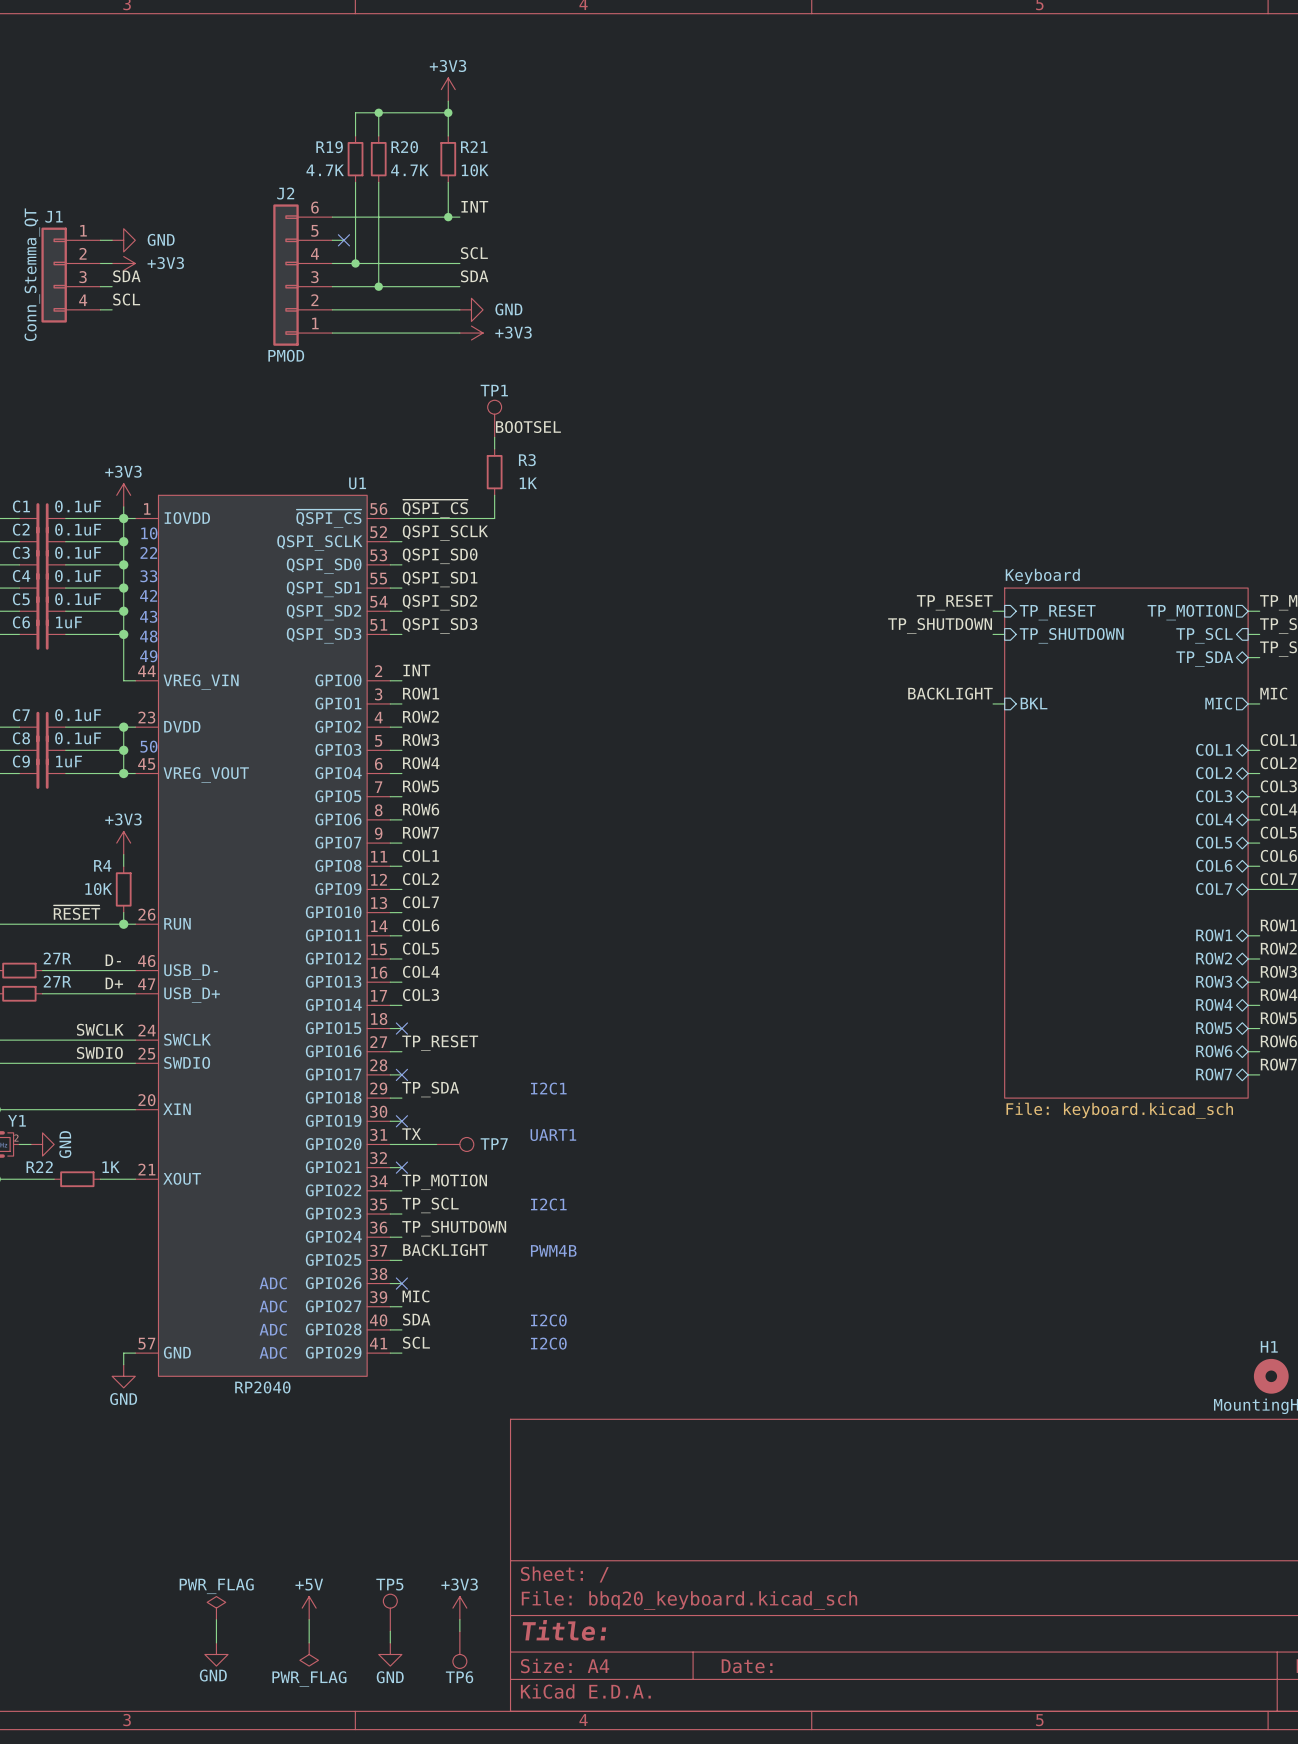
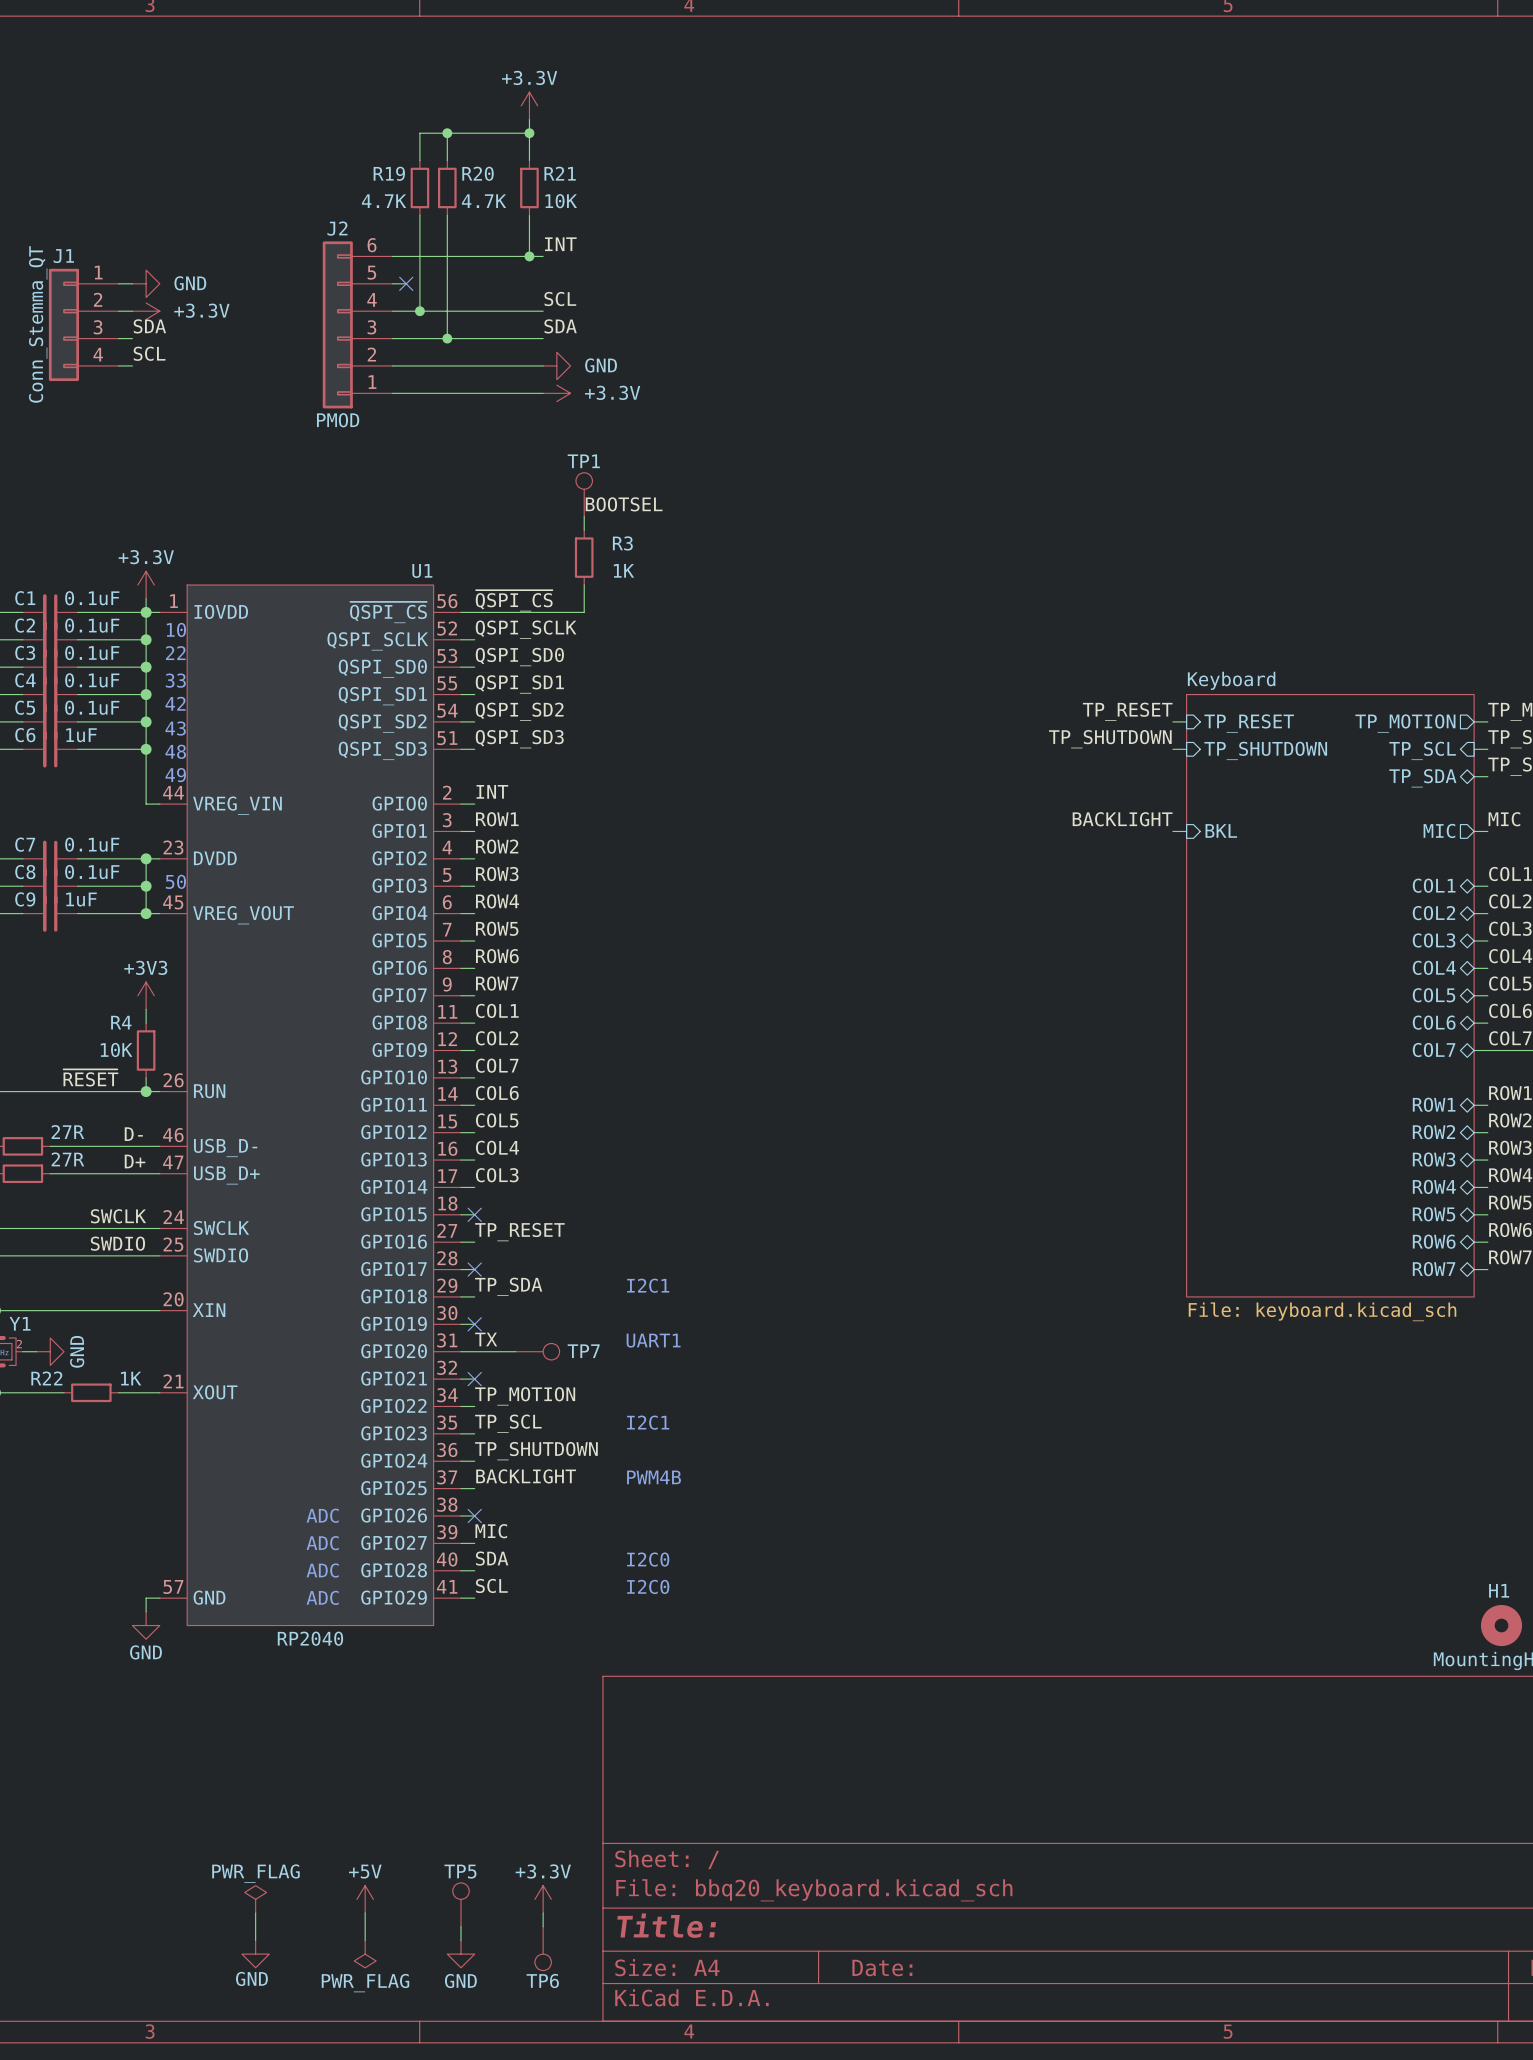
power symbol: +3V3 (448, 89) -> +3.3V (529, 105)
power symbol: +3V3 (123, 263) -> +3.3V (146, 311)
power symbol: +3V3 (471, 333) -> +3.3V (556, 393)
power symbol: +3V3 (123, 495) -> +3.3V (146, 585)
power symbol: +3V3 (459, 1608) -> +3.3V (543, 1899)

